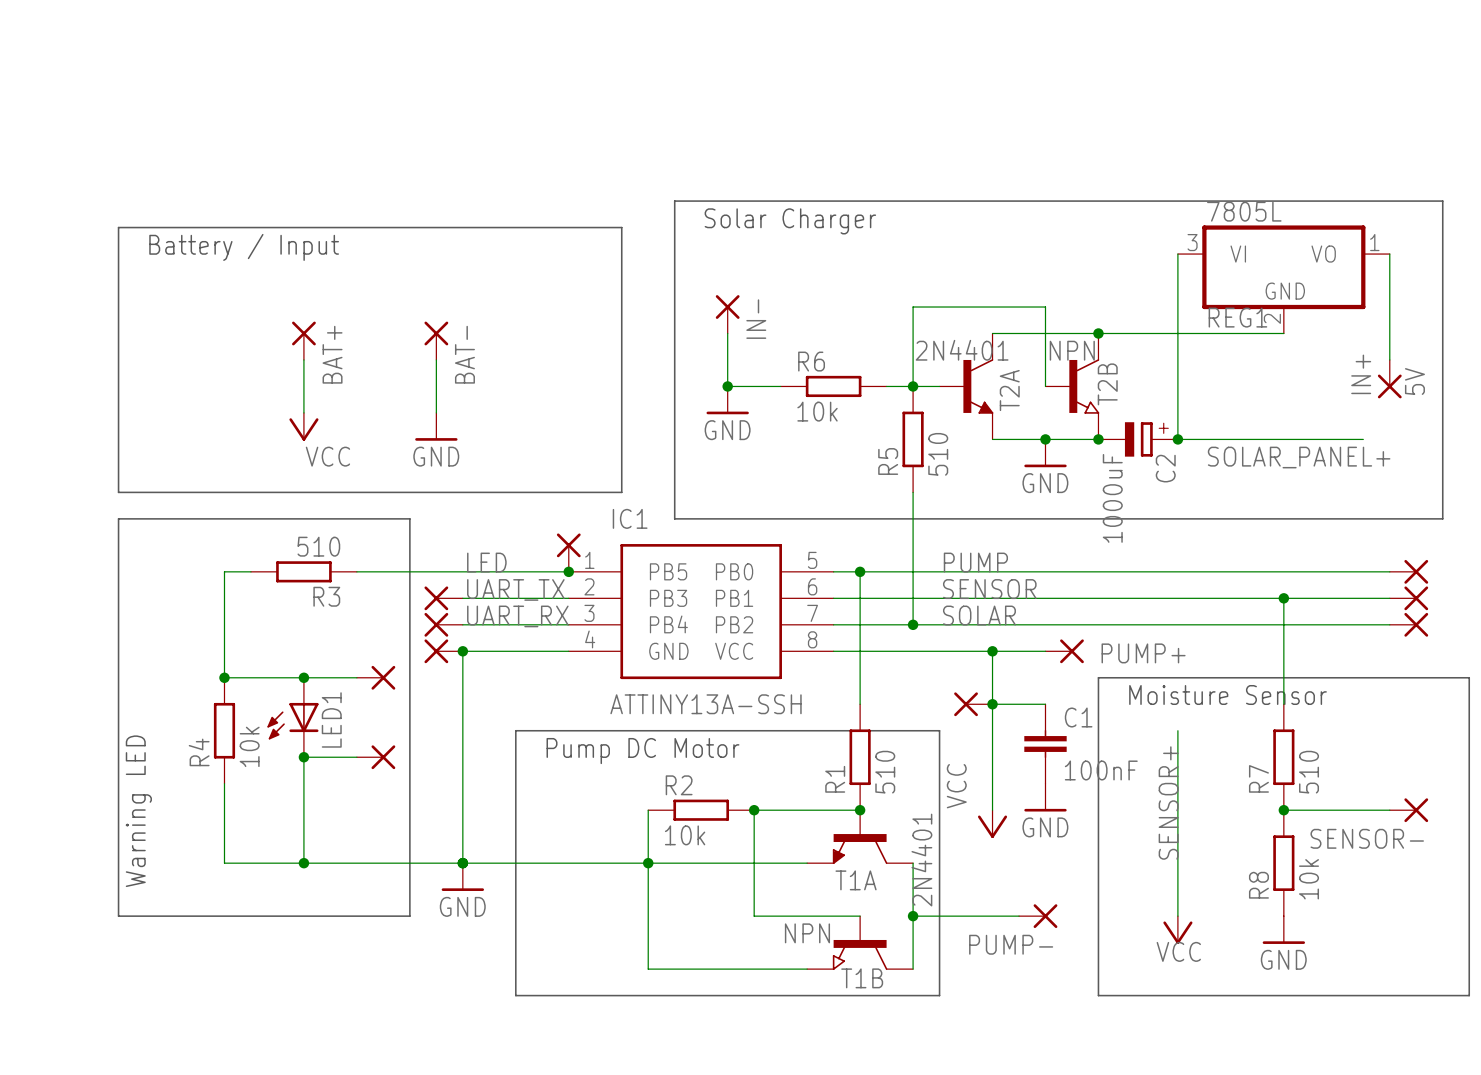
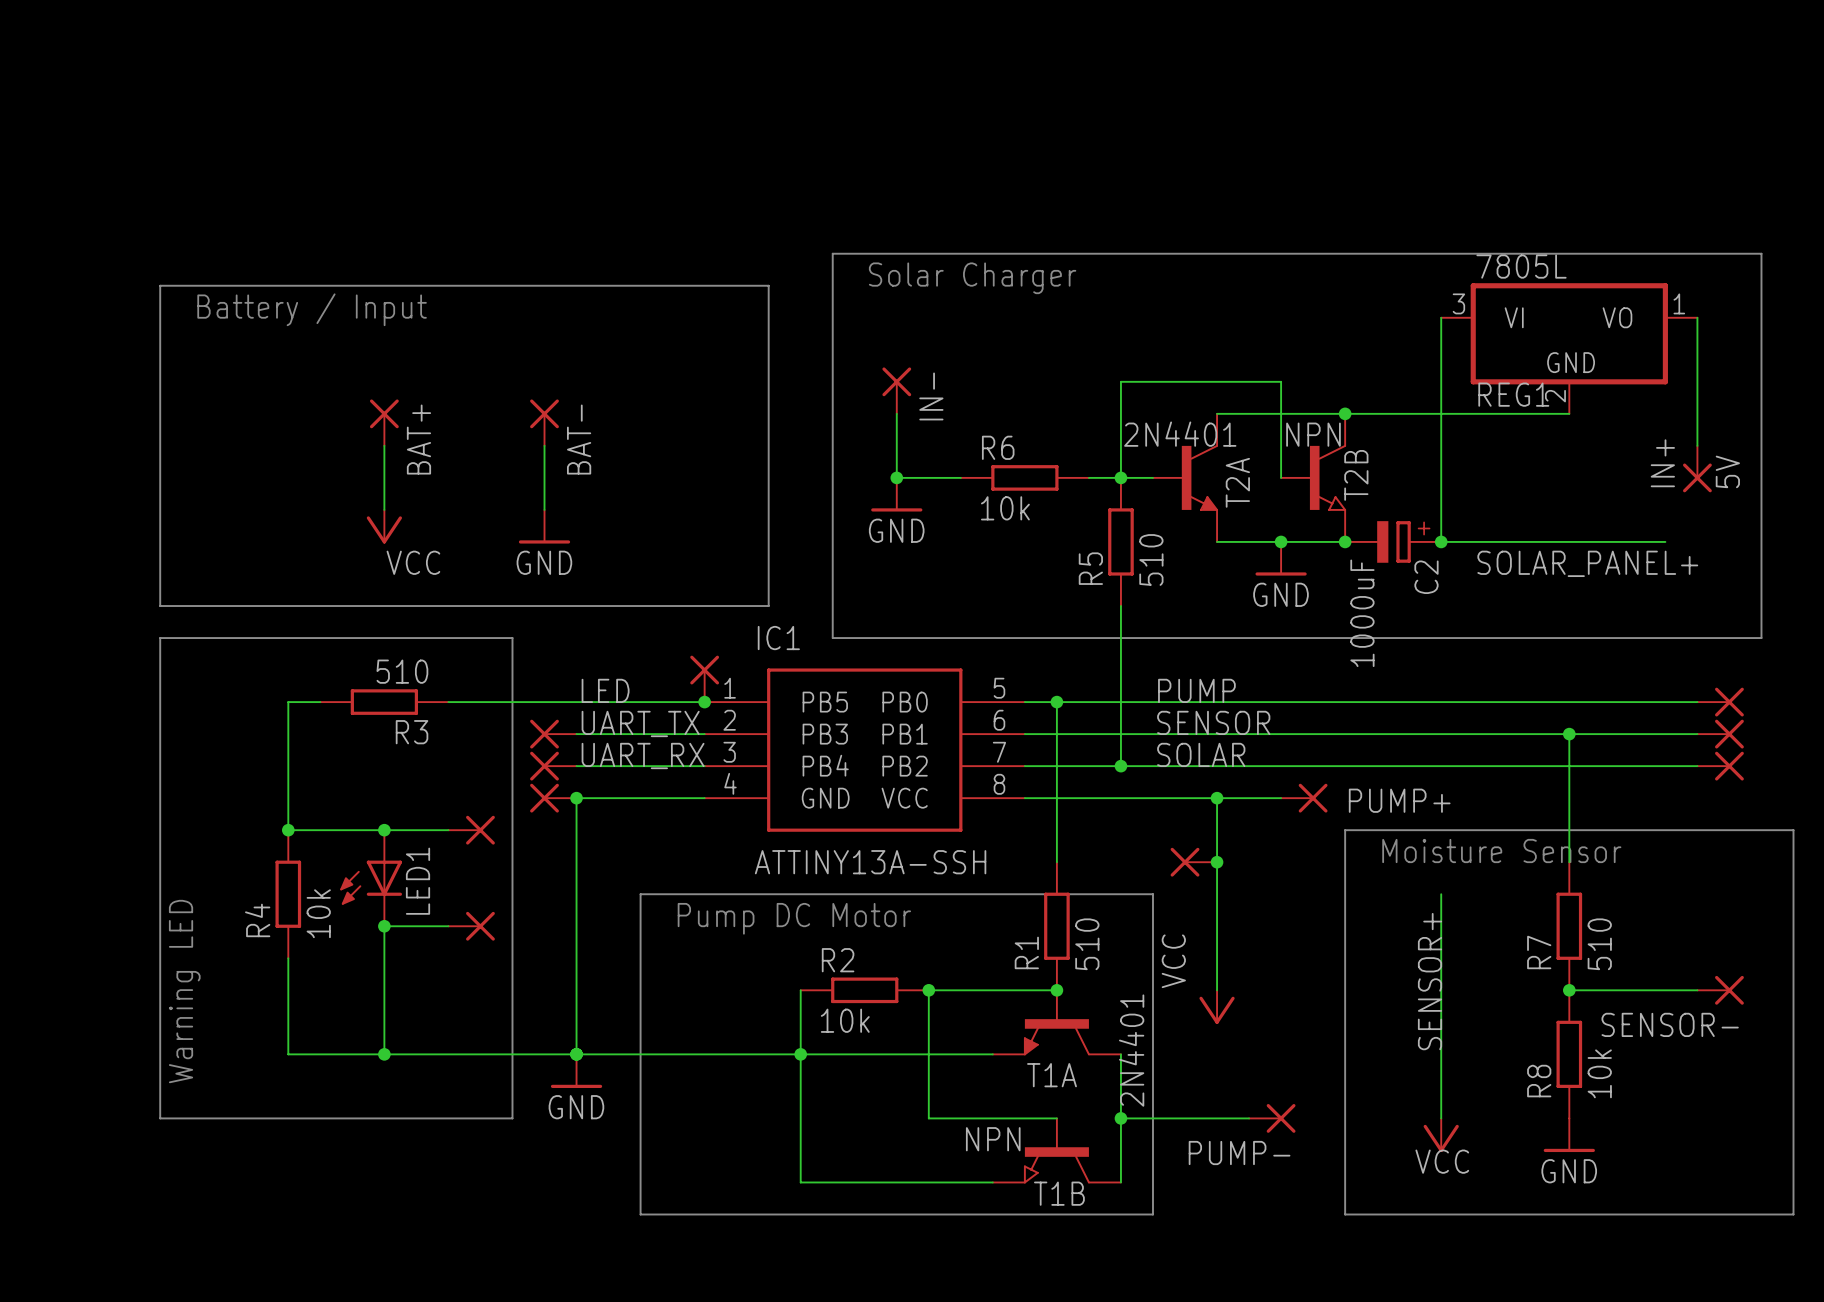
wire: (992, 704) (1045, 704) -> none
C1: 100nF (1045, 743) -> none
power symbol: GND (1045, 797) -> none

